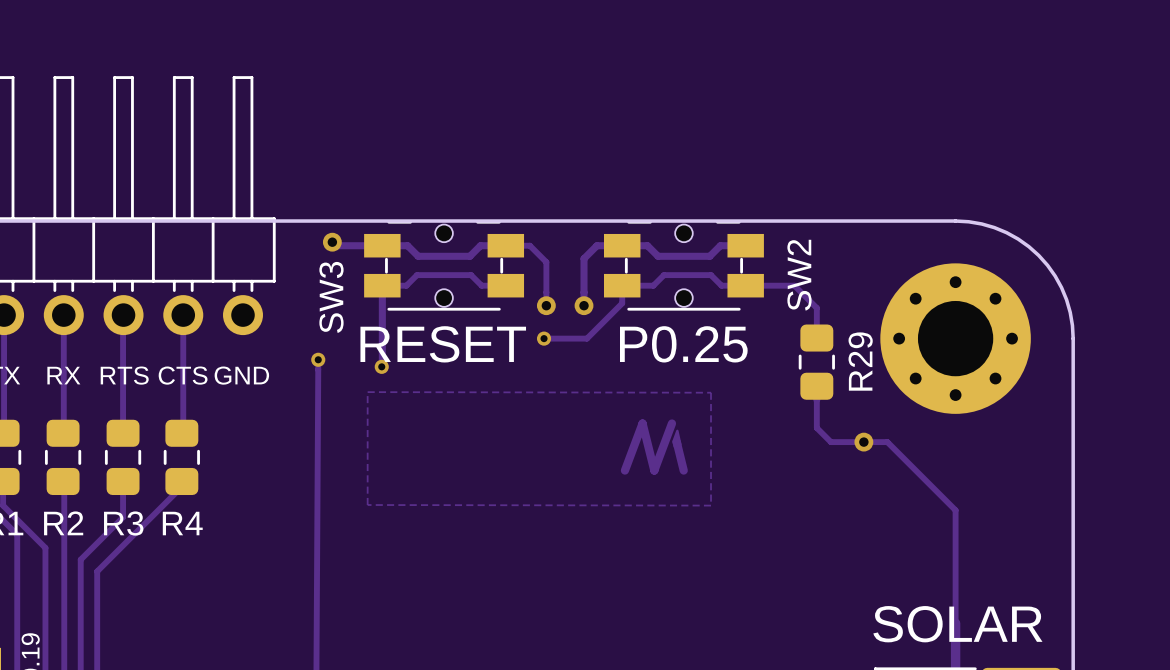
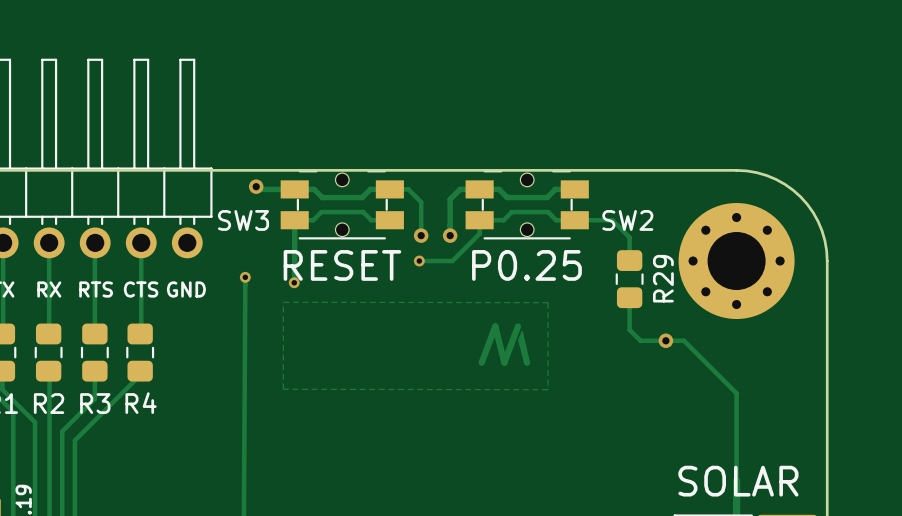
SW2 name rotation: 0° (799, 275) -> 90° clockwise (627, 220)
SW3 name rotation: 0° (331, 297) -> 90° clockwise (243, 220)

